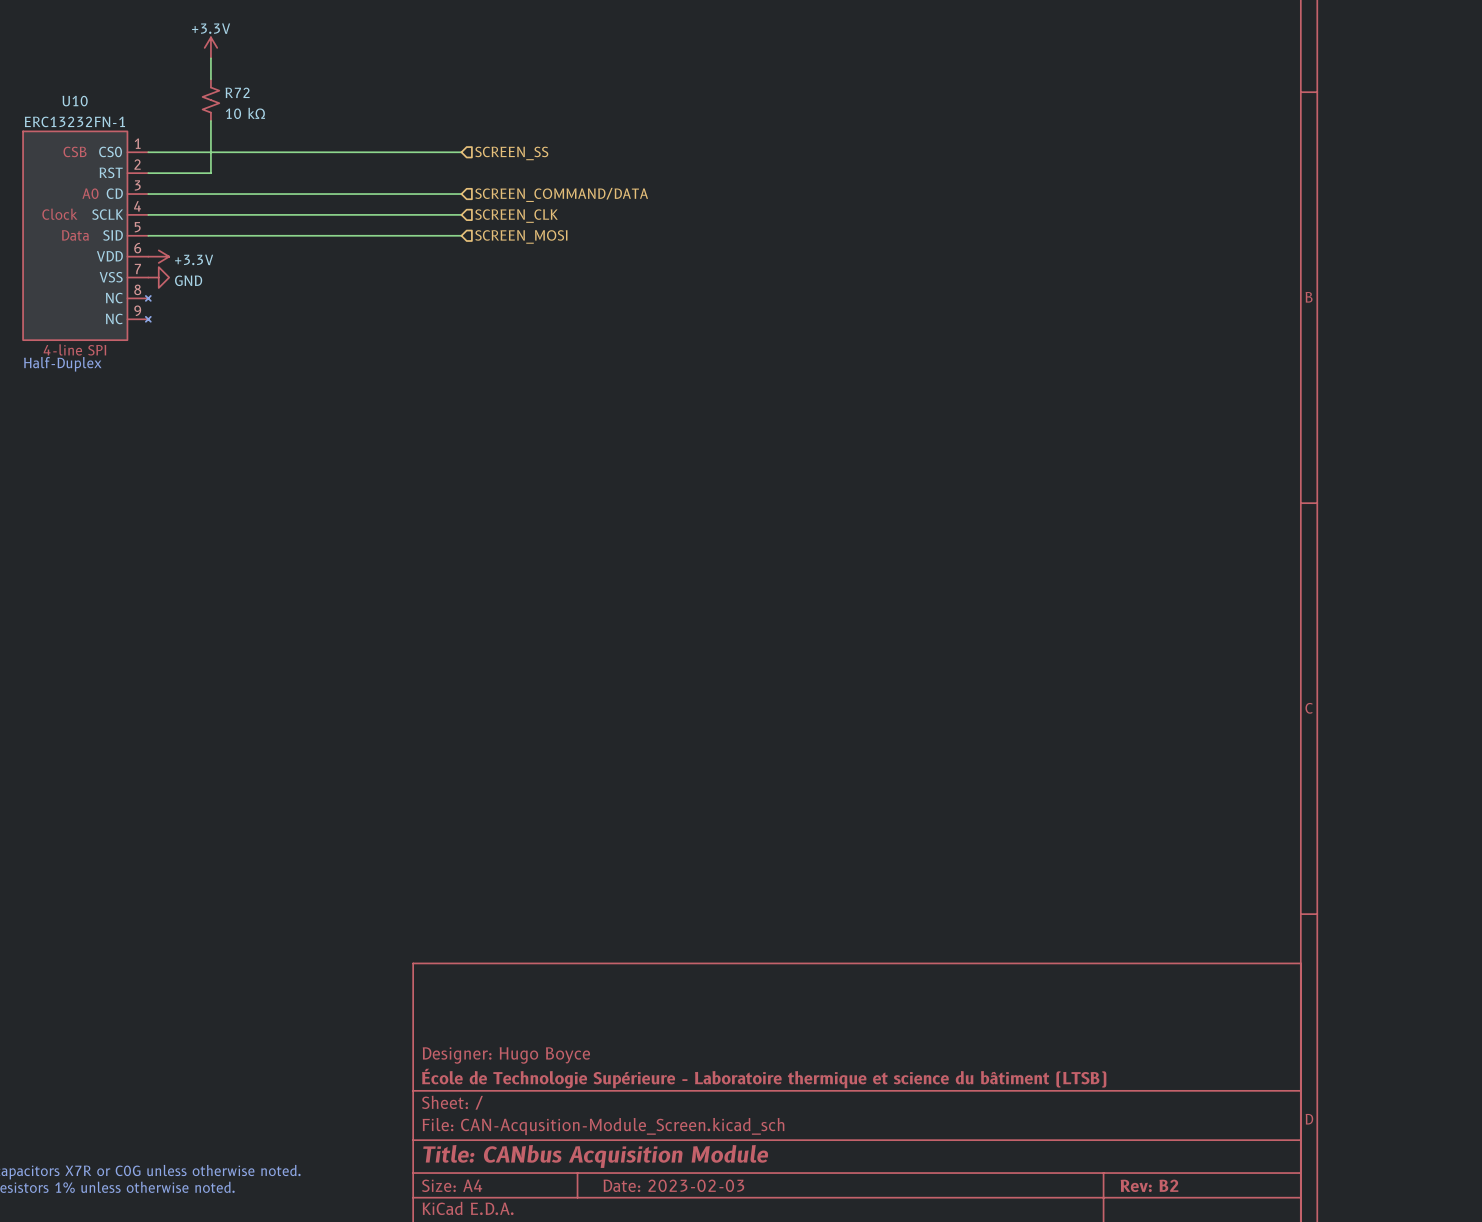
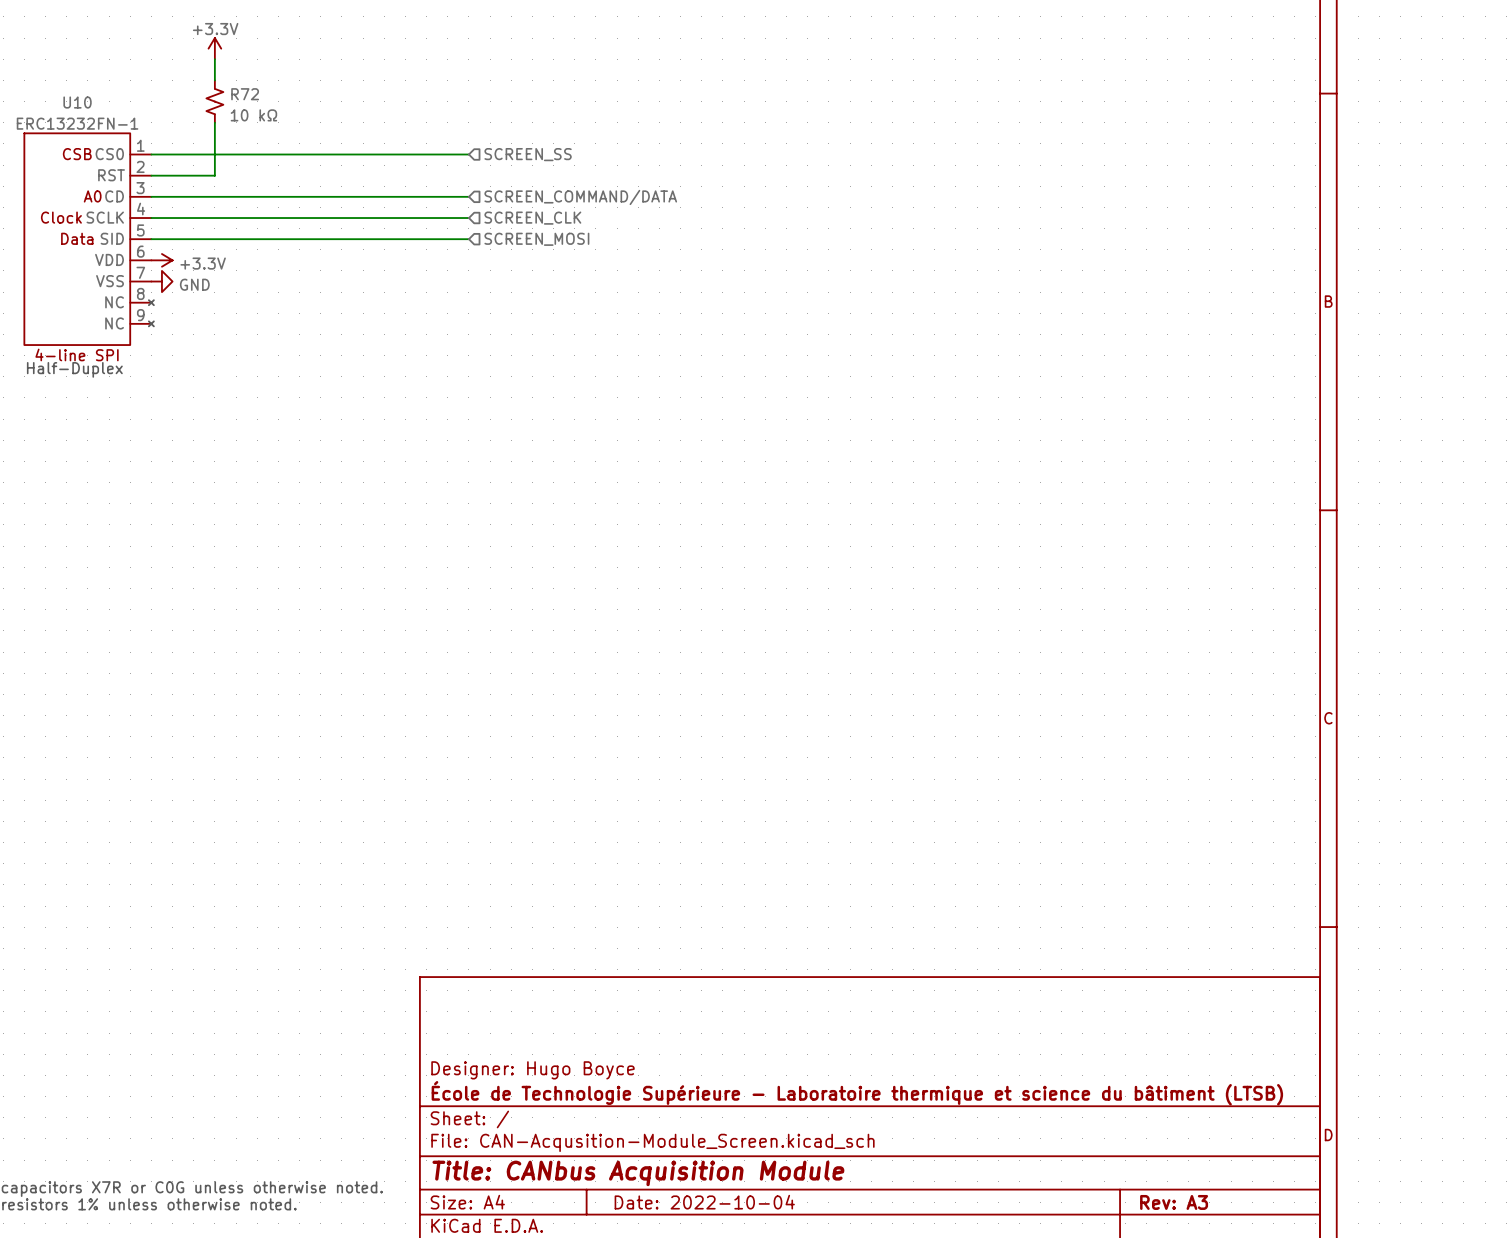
title block: Date: 2023-02-03 (673, 1185) -> Date: 2022-10-04 (704, 1202)
title block: Rev: B2 (1149, 1185) -> Rev: A3 (1174, 1202)

